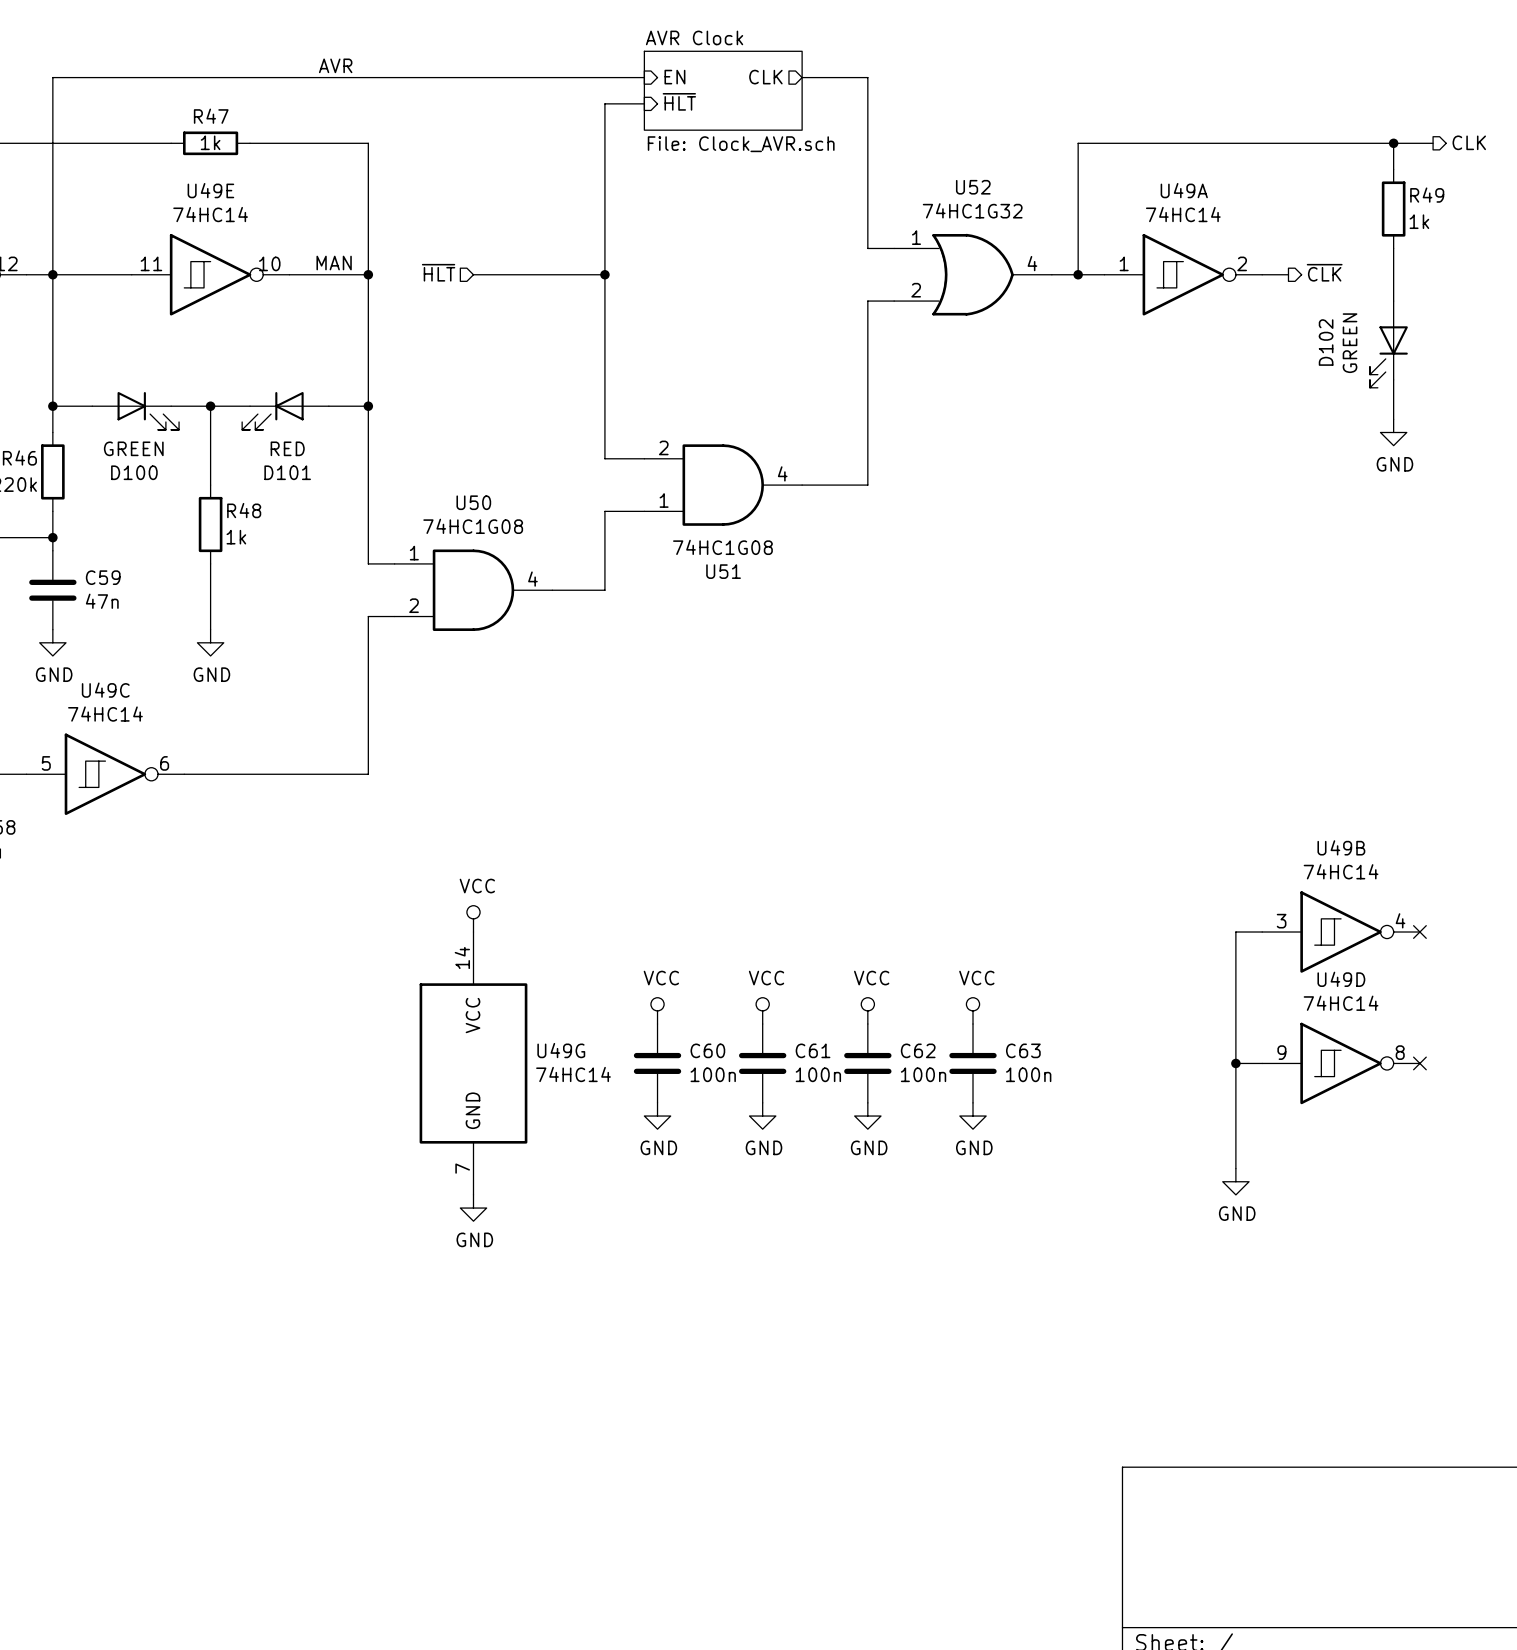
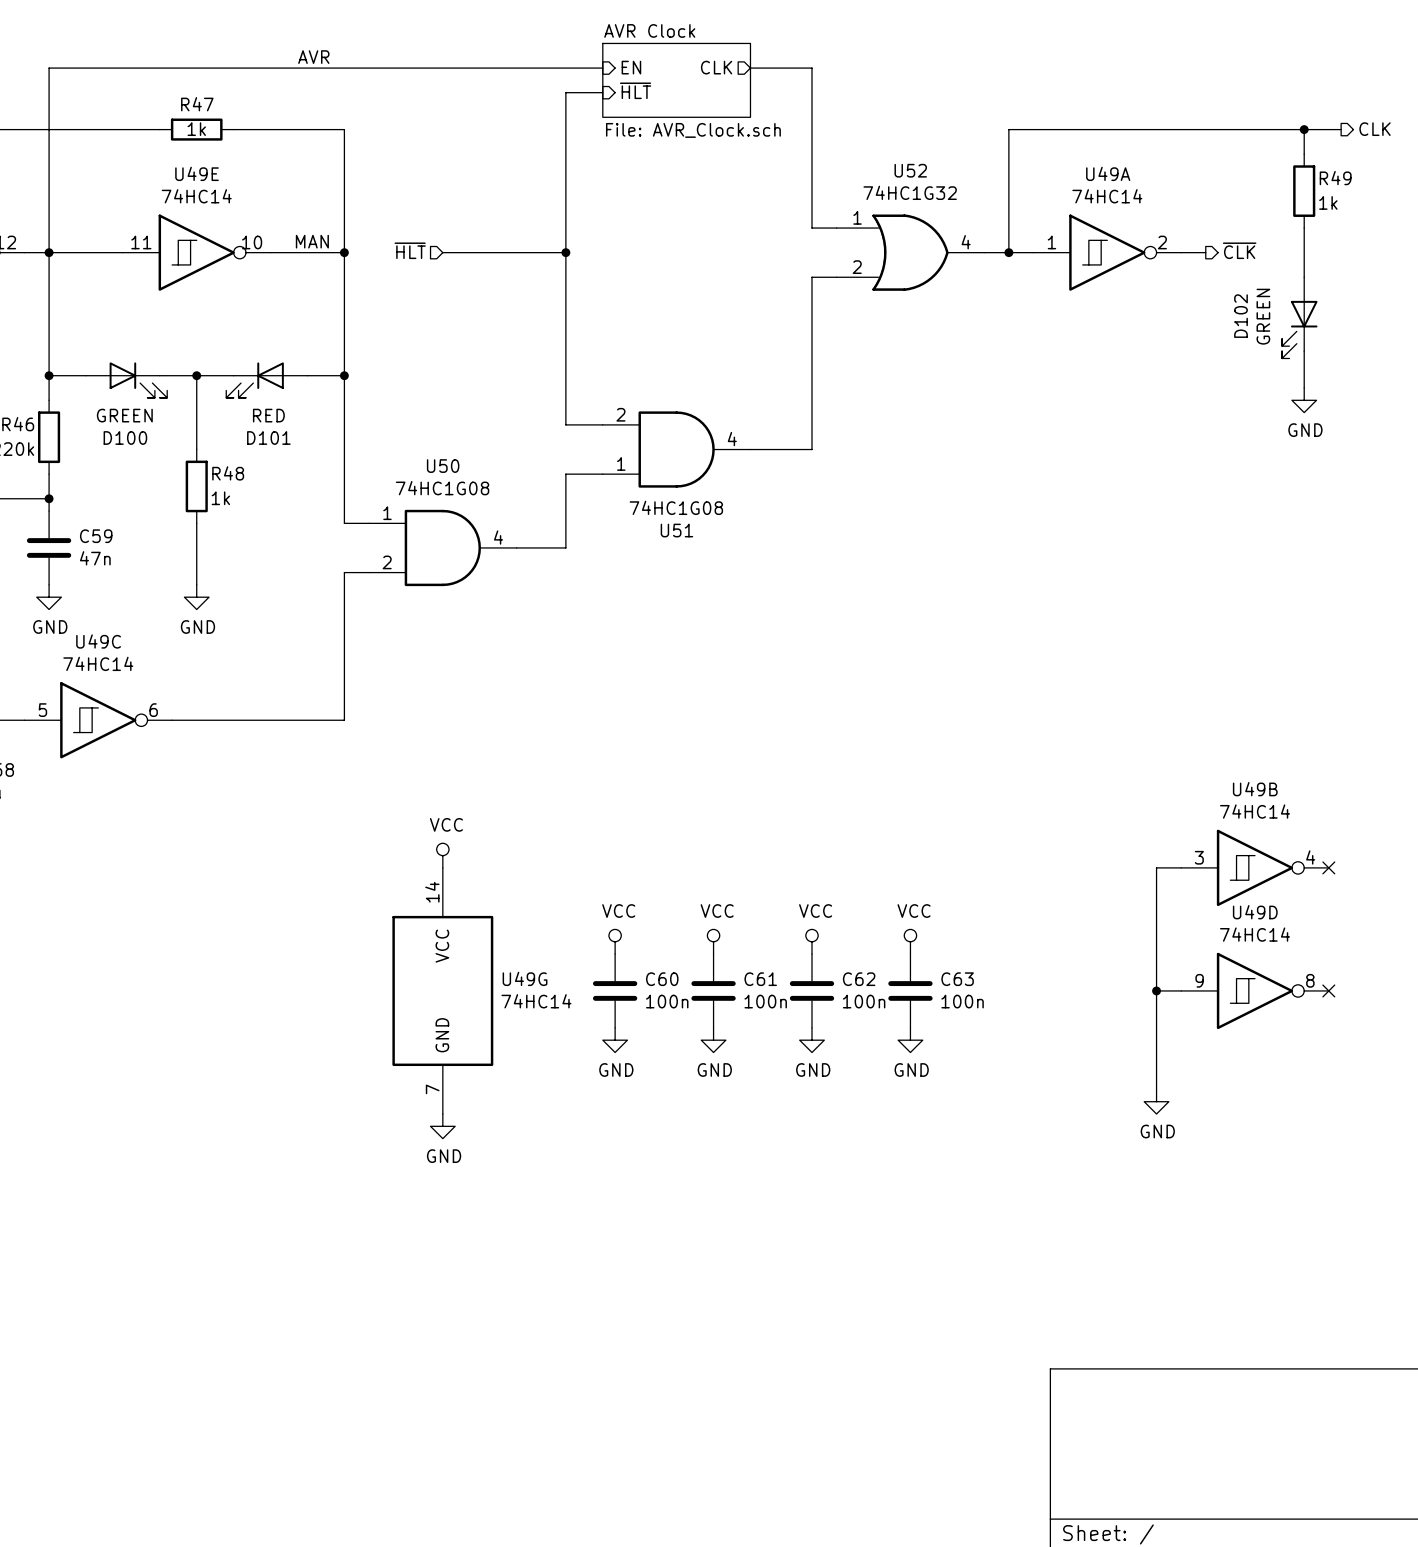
sheet AVR Clock value: File: Clock_AVR.sch (741, 144) -> File: AVR_Clock.sch (693, 130)

